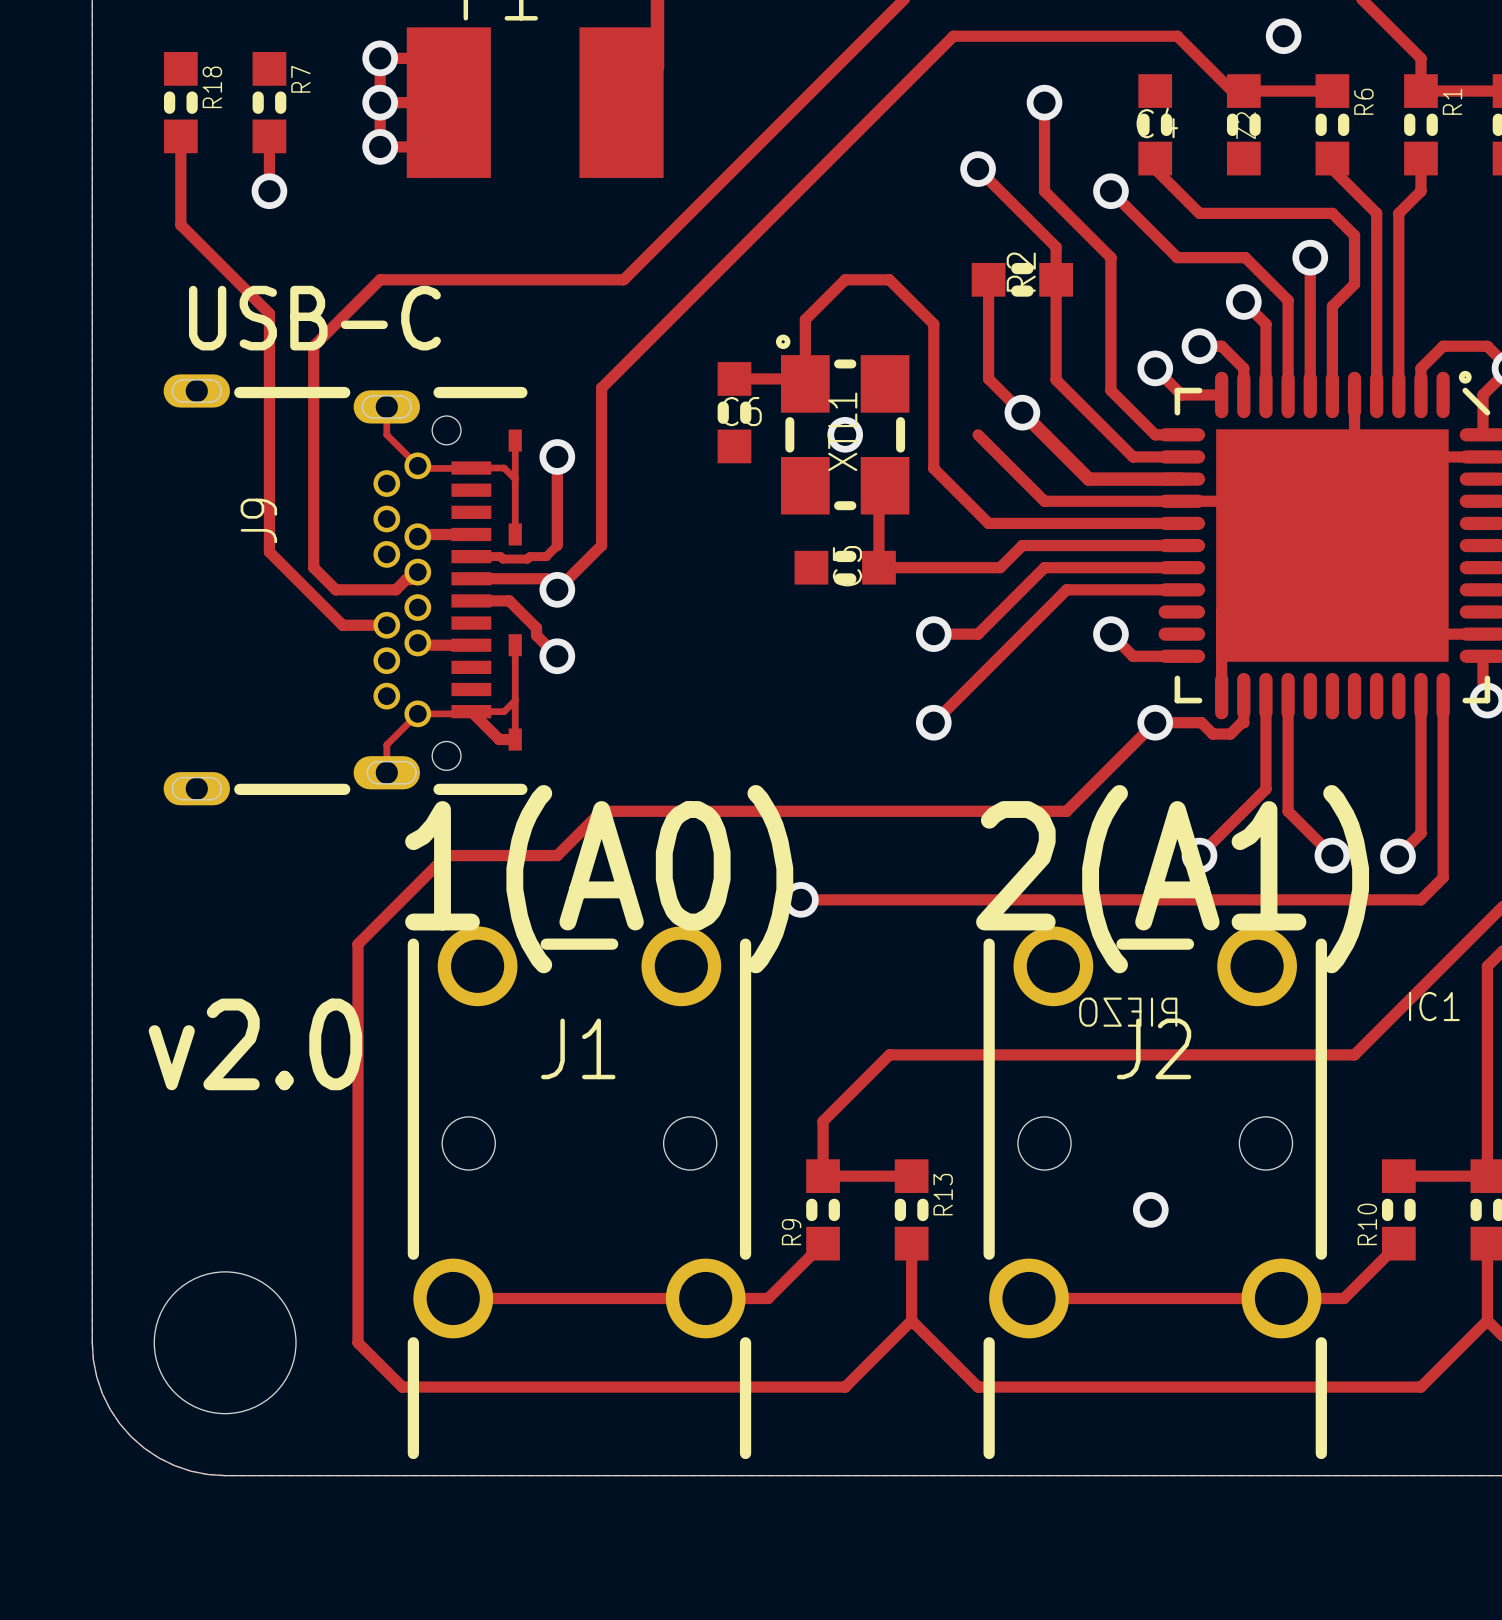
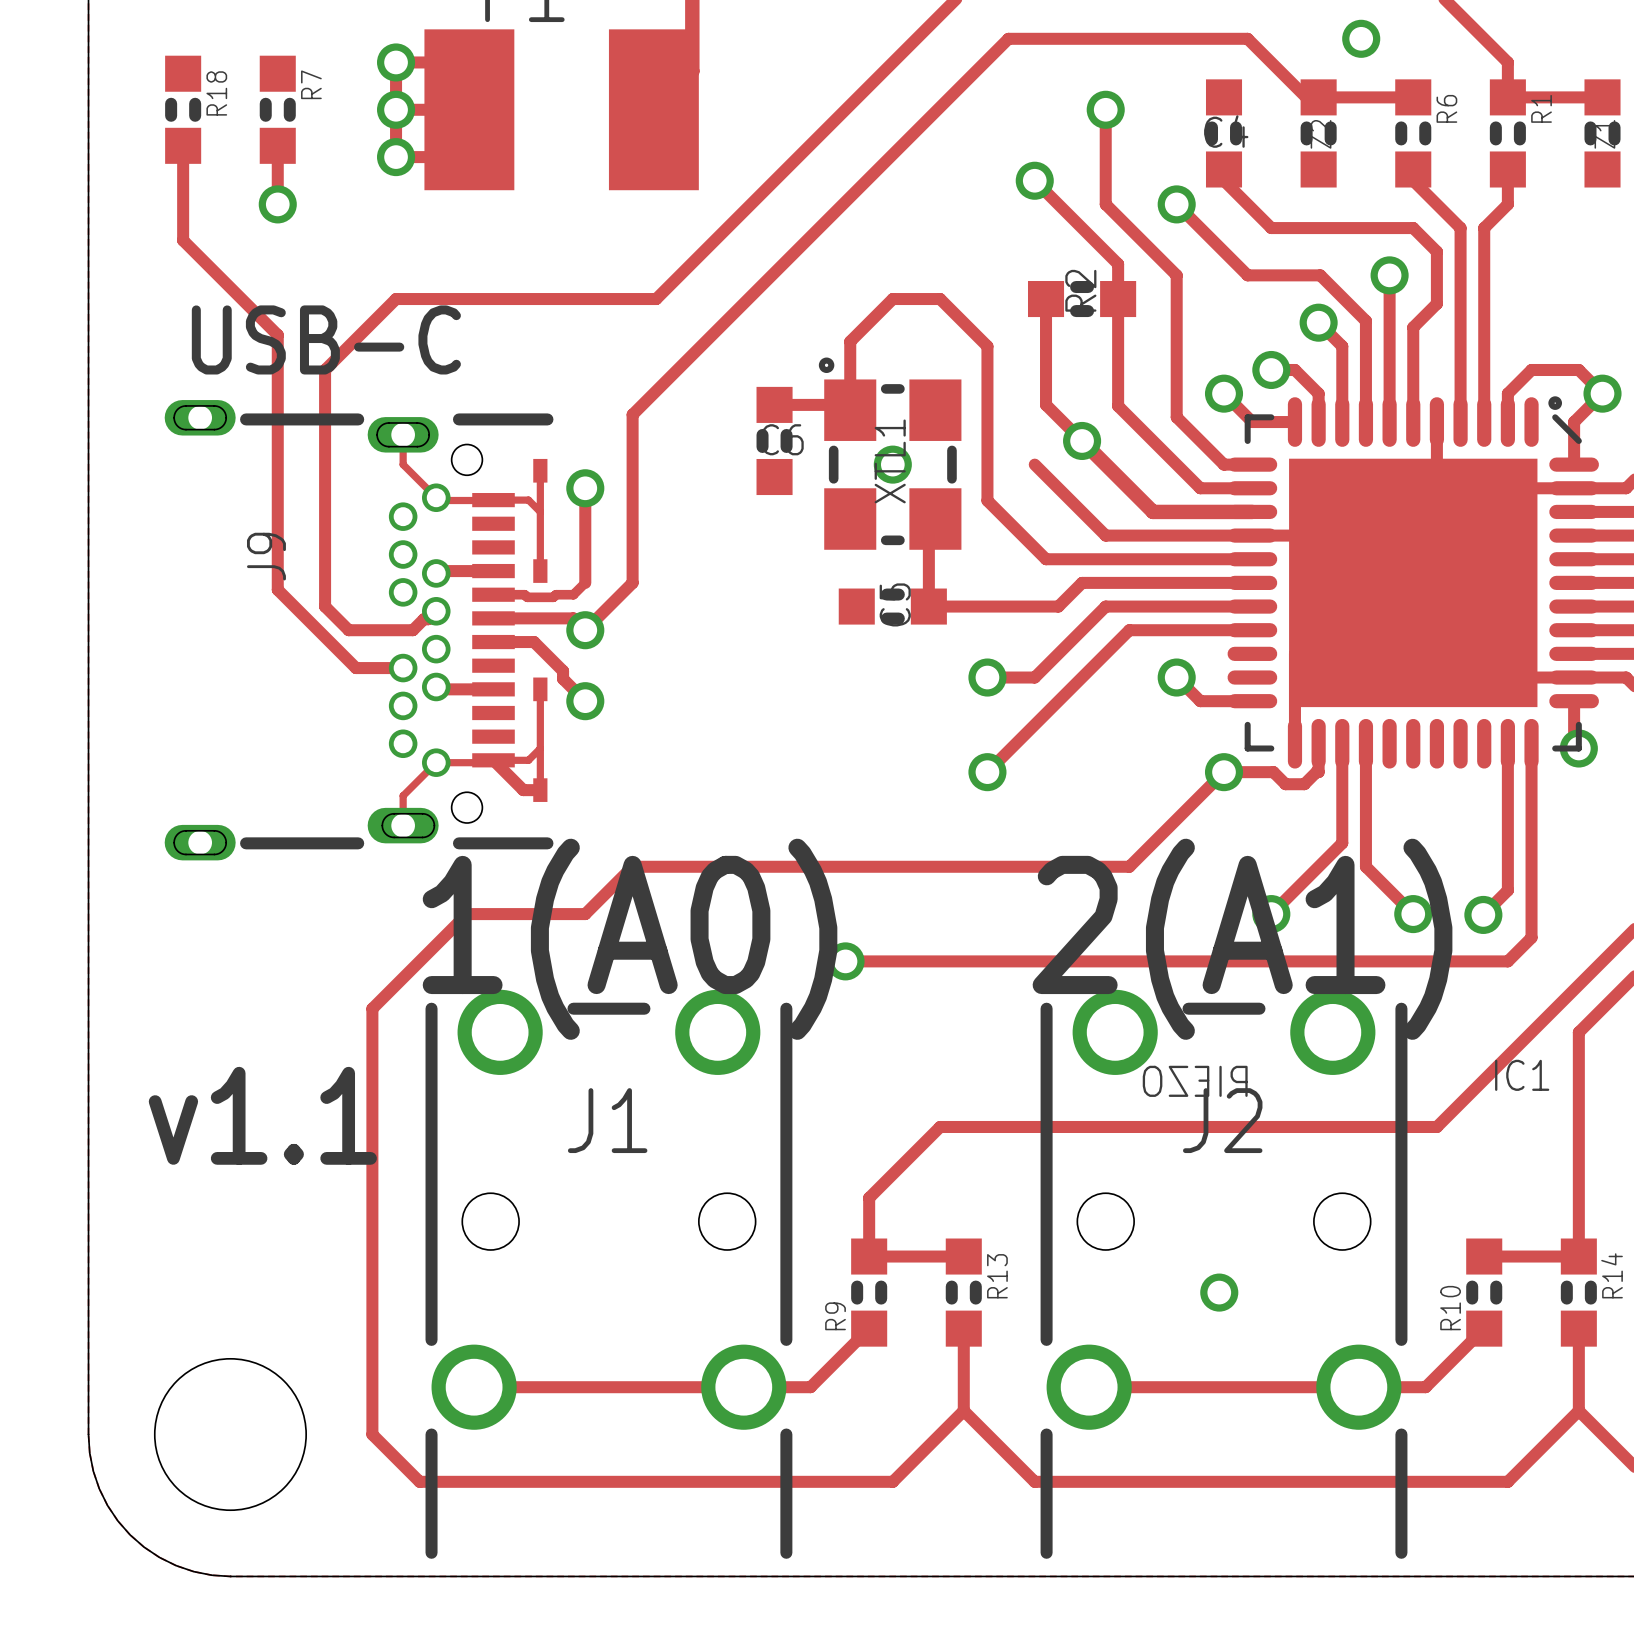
text: v2.0 (255, 1044) -> v1.1 (262, 1115)

